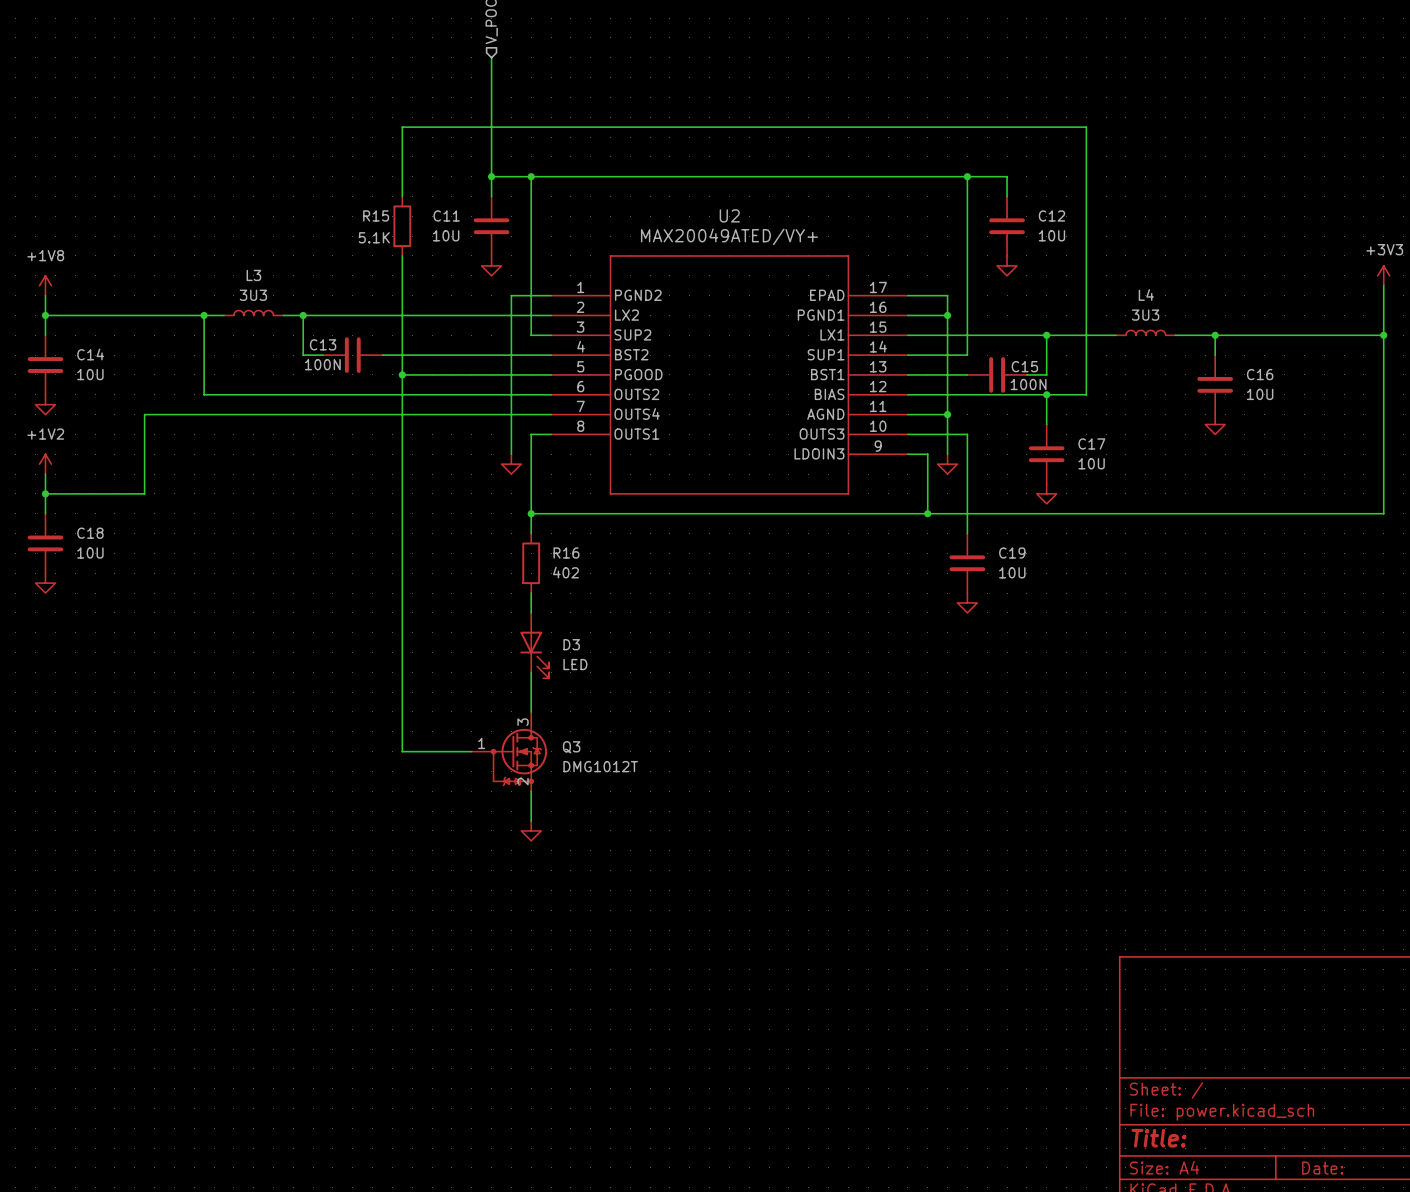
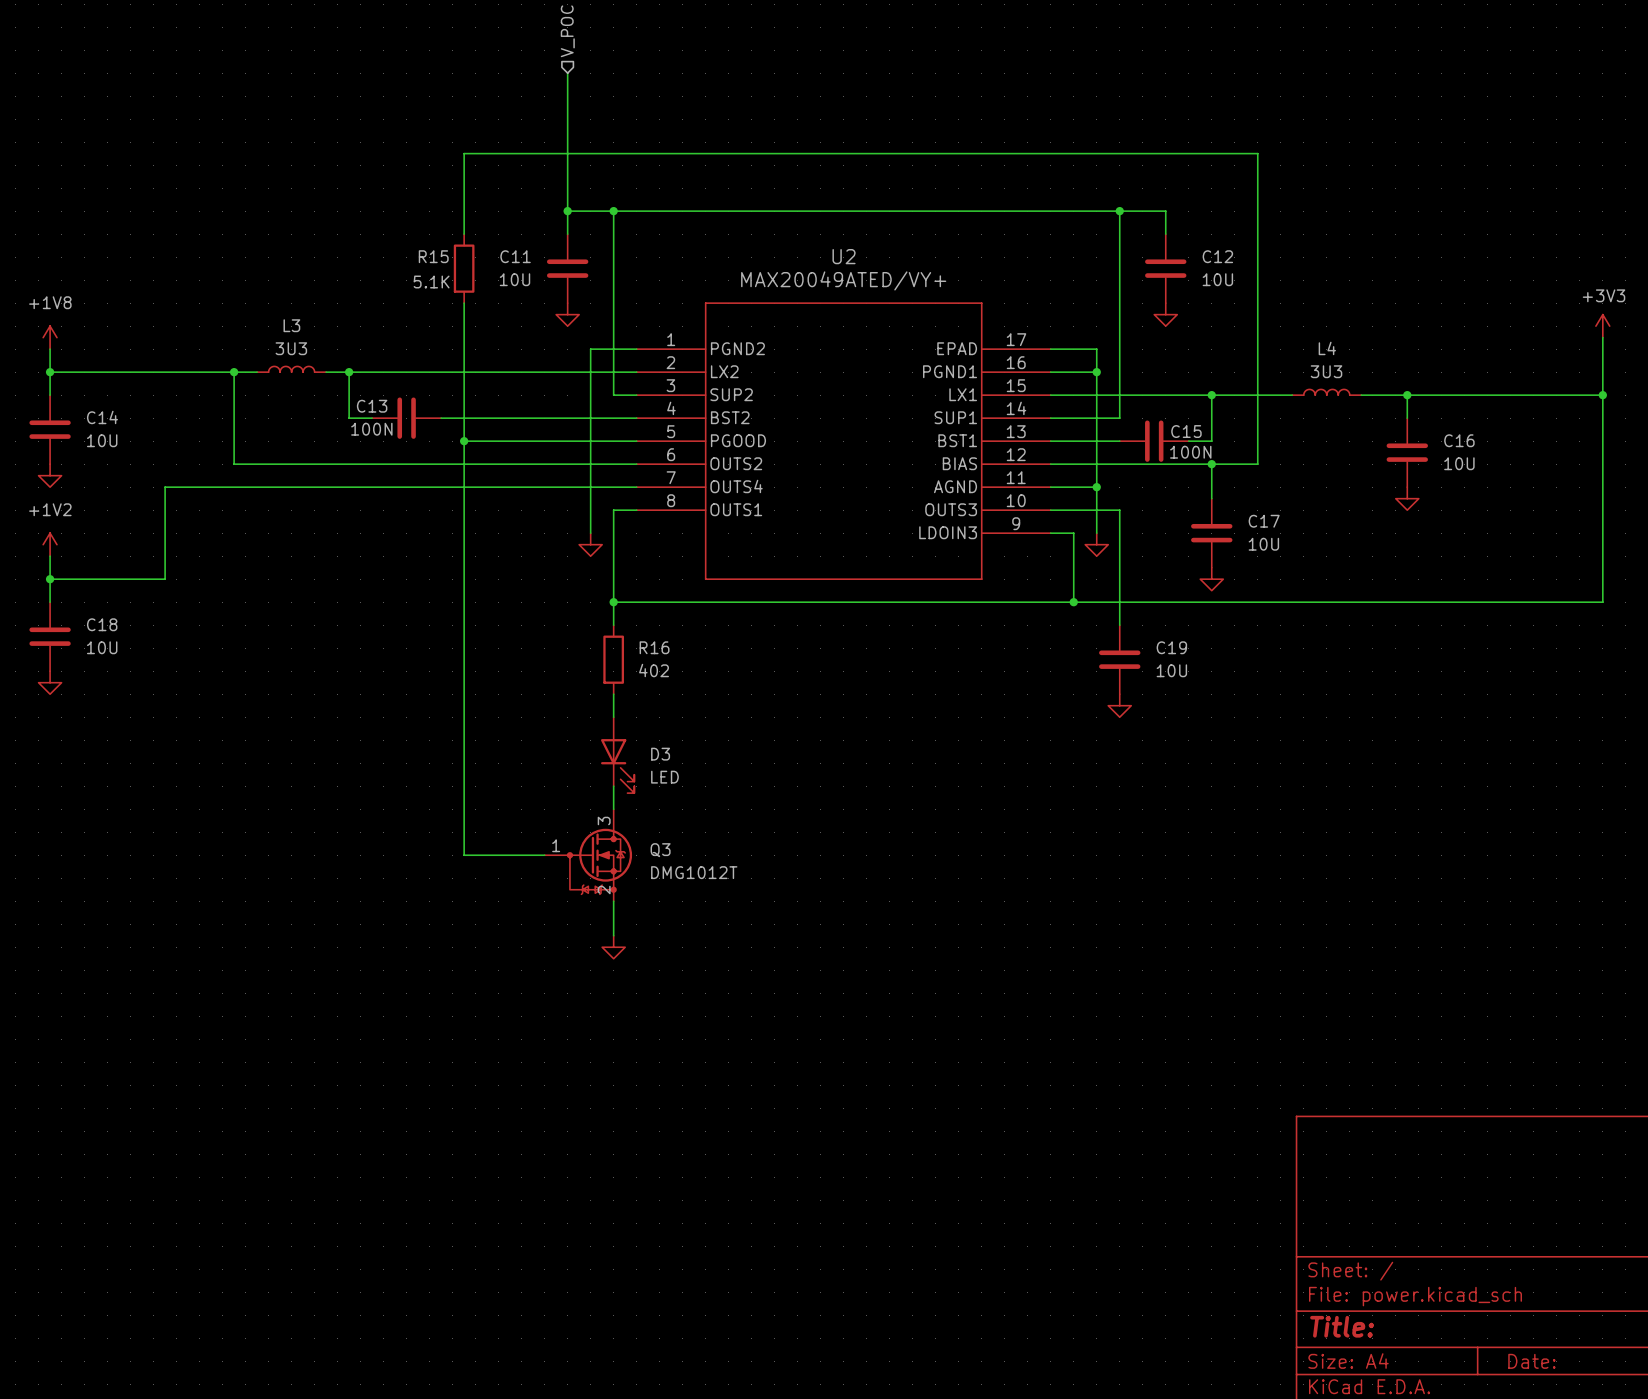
wire: (402, 731) (402, 751) (471, 751) -> (464, 855) (544, 855)
Q3 position: (509, 751) -> (588, 855)
power symbol position: (531, 830) -> (613, 947)

